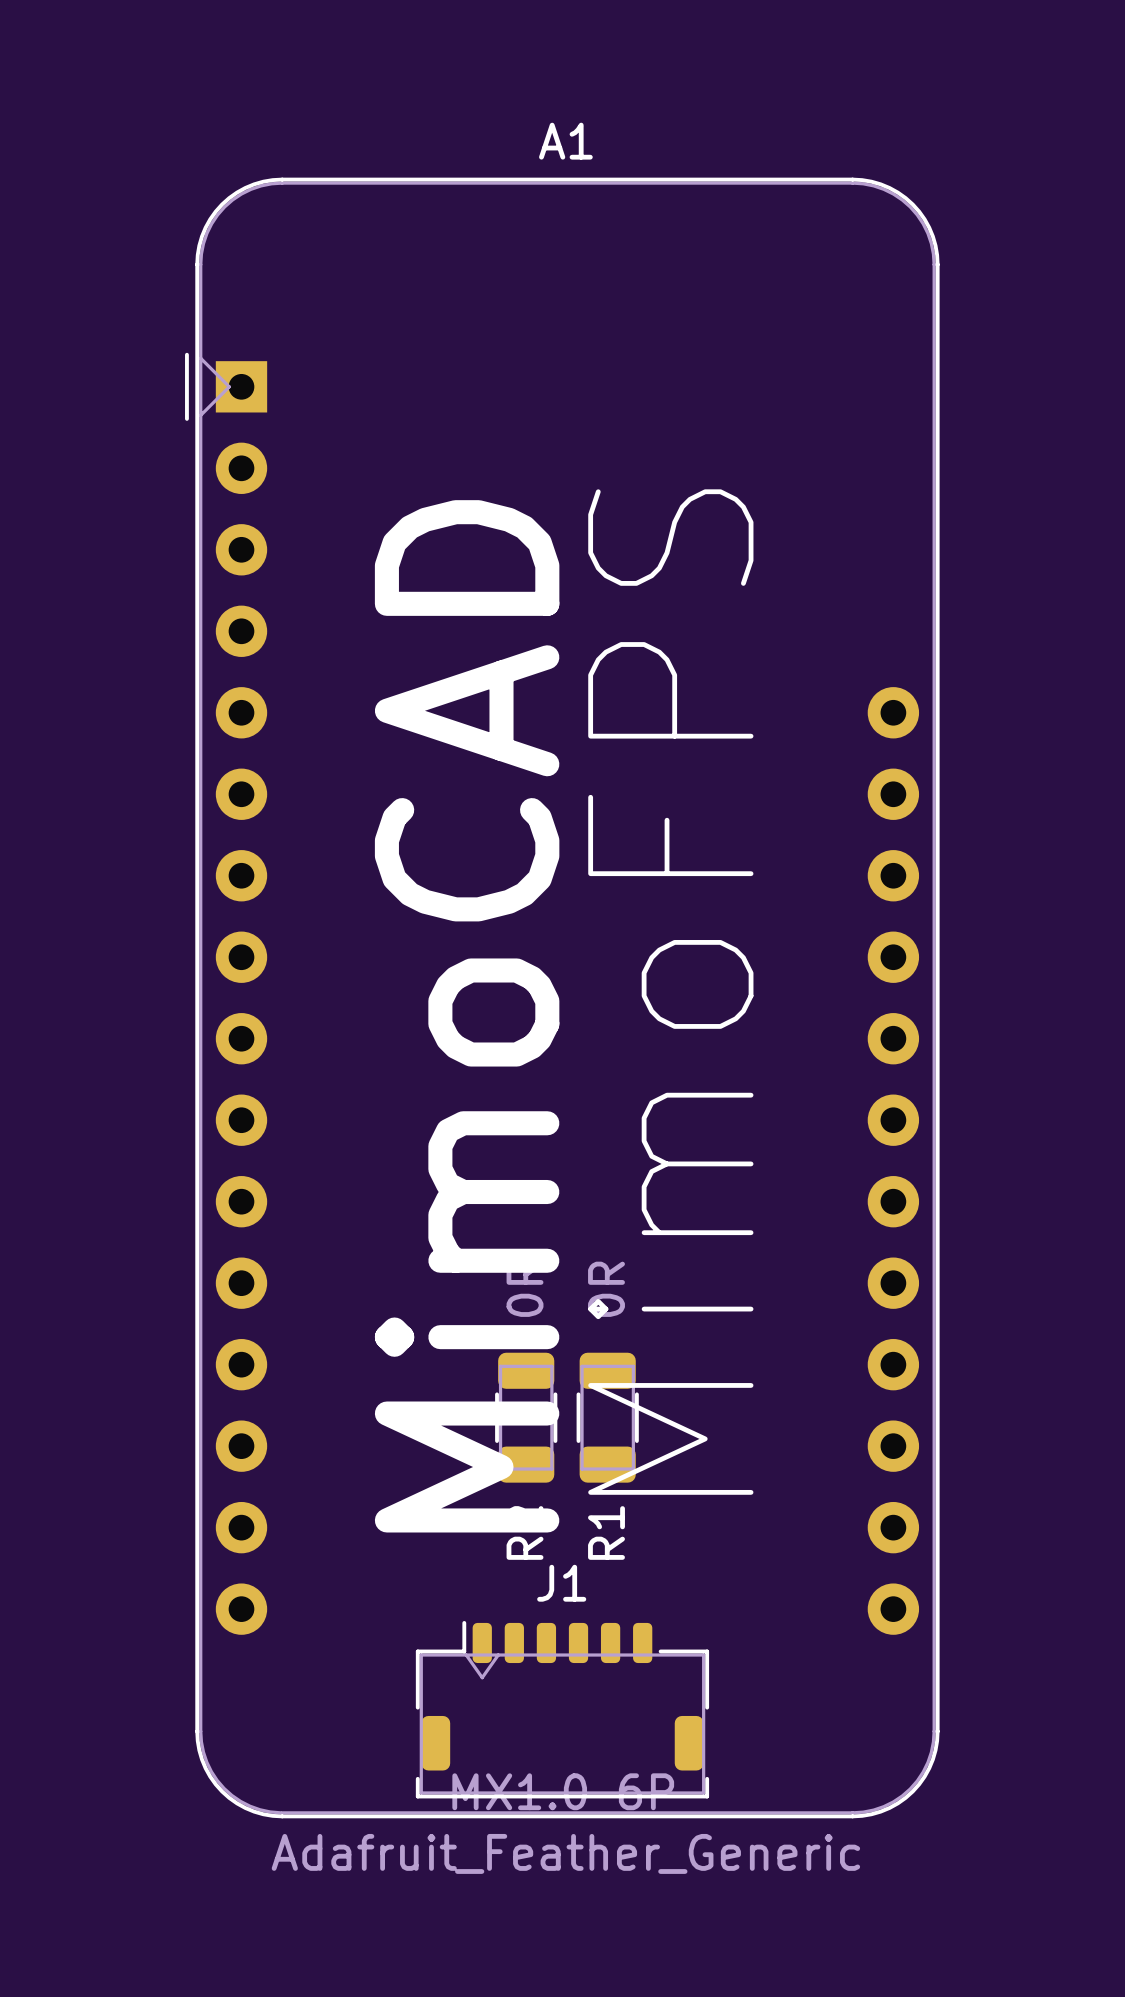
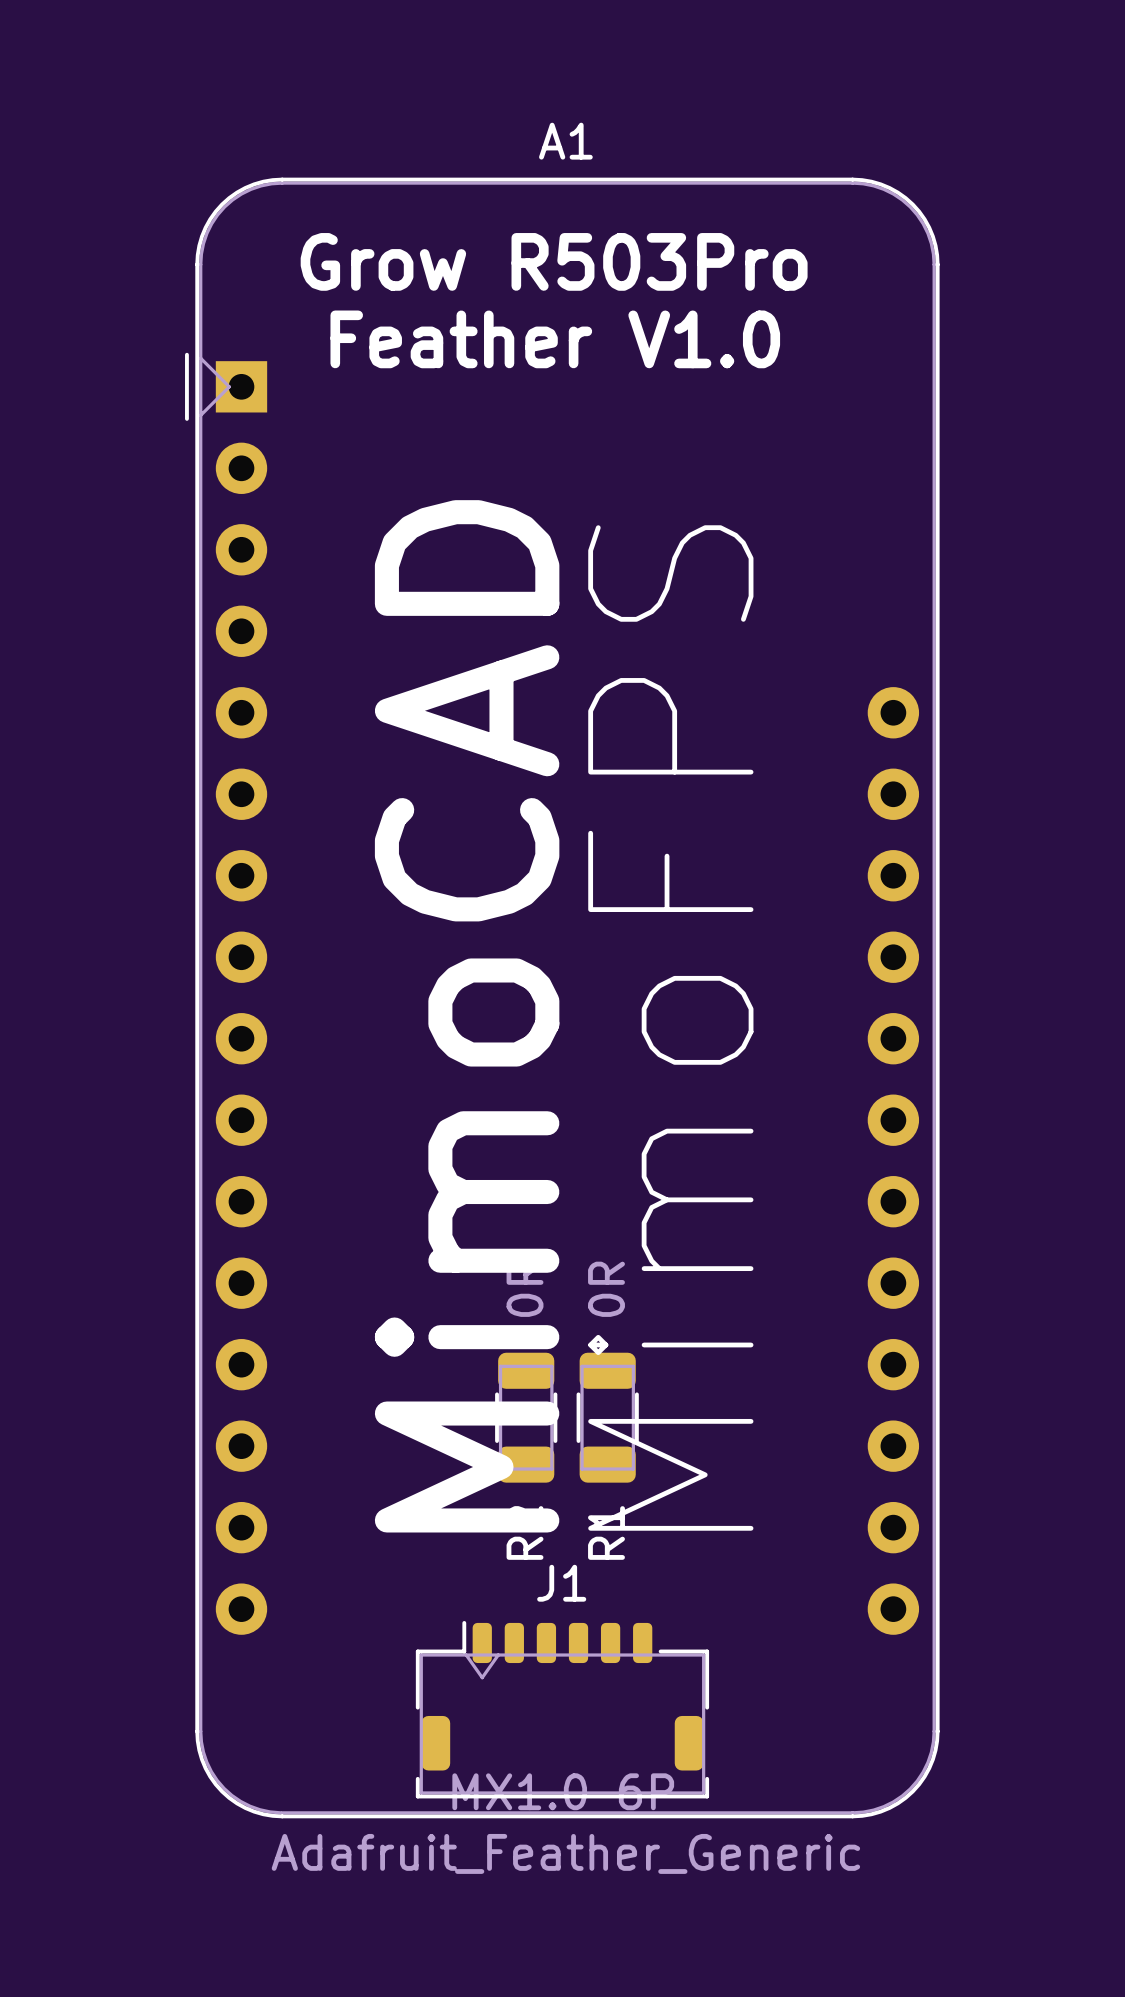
text: none -> Grow R503Pro (554, 261)
text: none -> Feather V1.0 (555, 339)
text position: MimoFPS (670, 992) -> MimoFPS (670, 1027)

